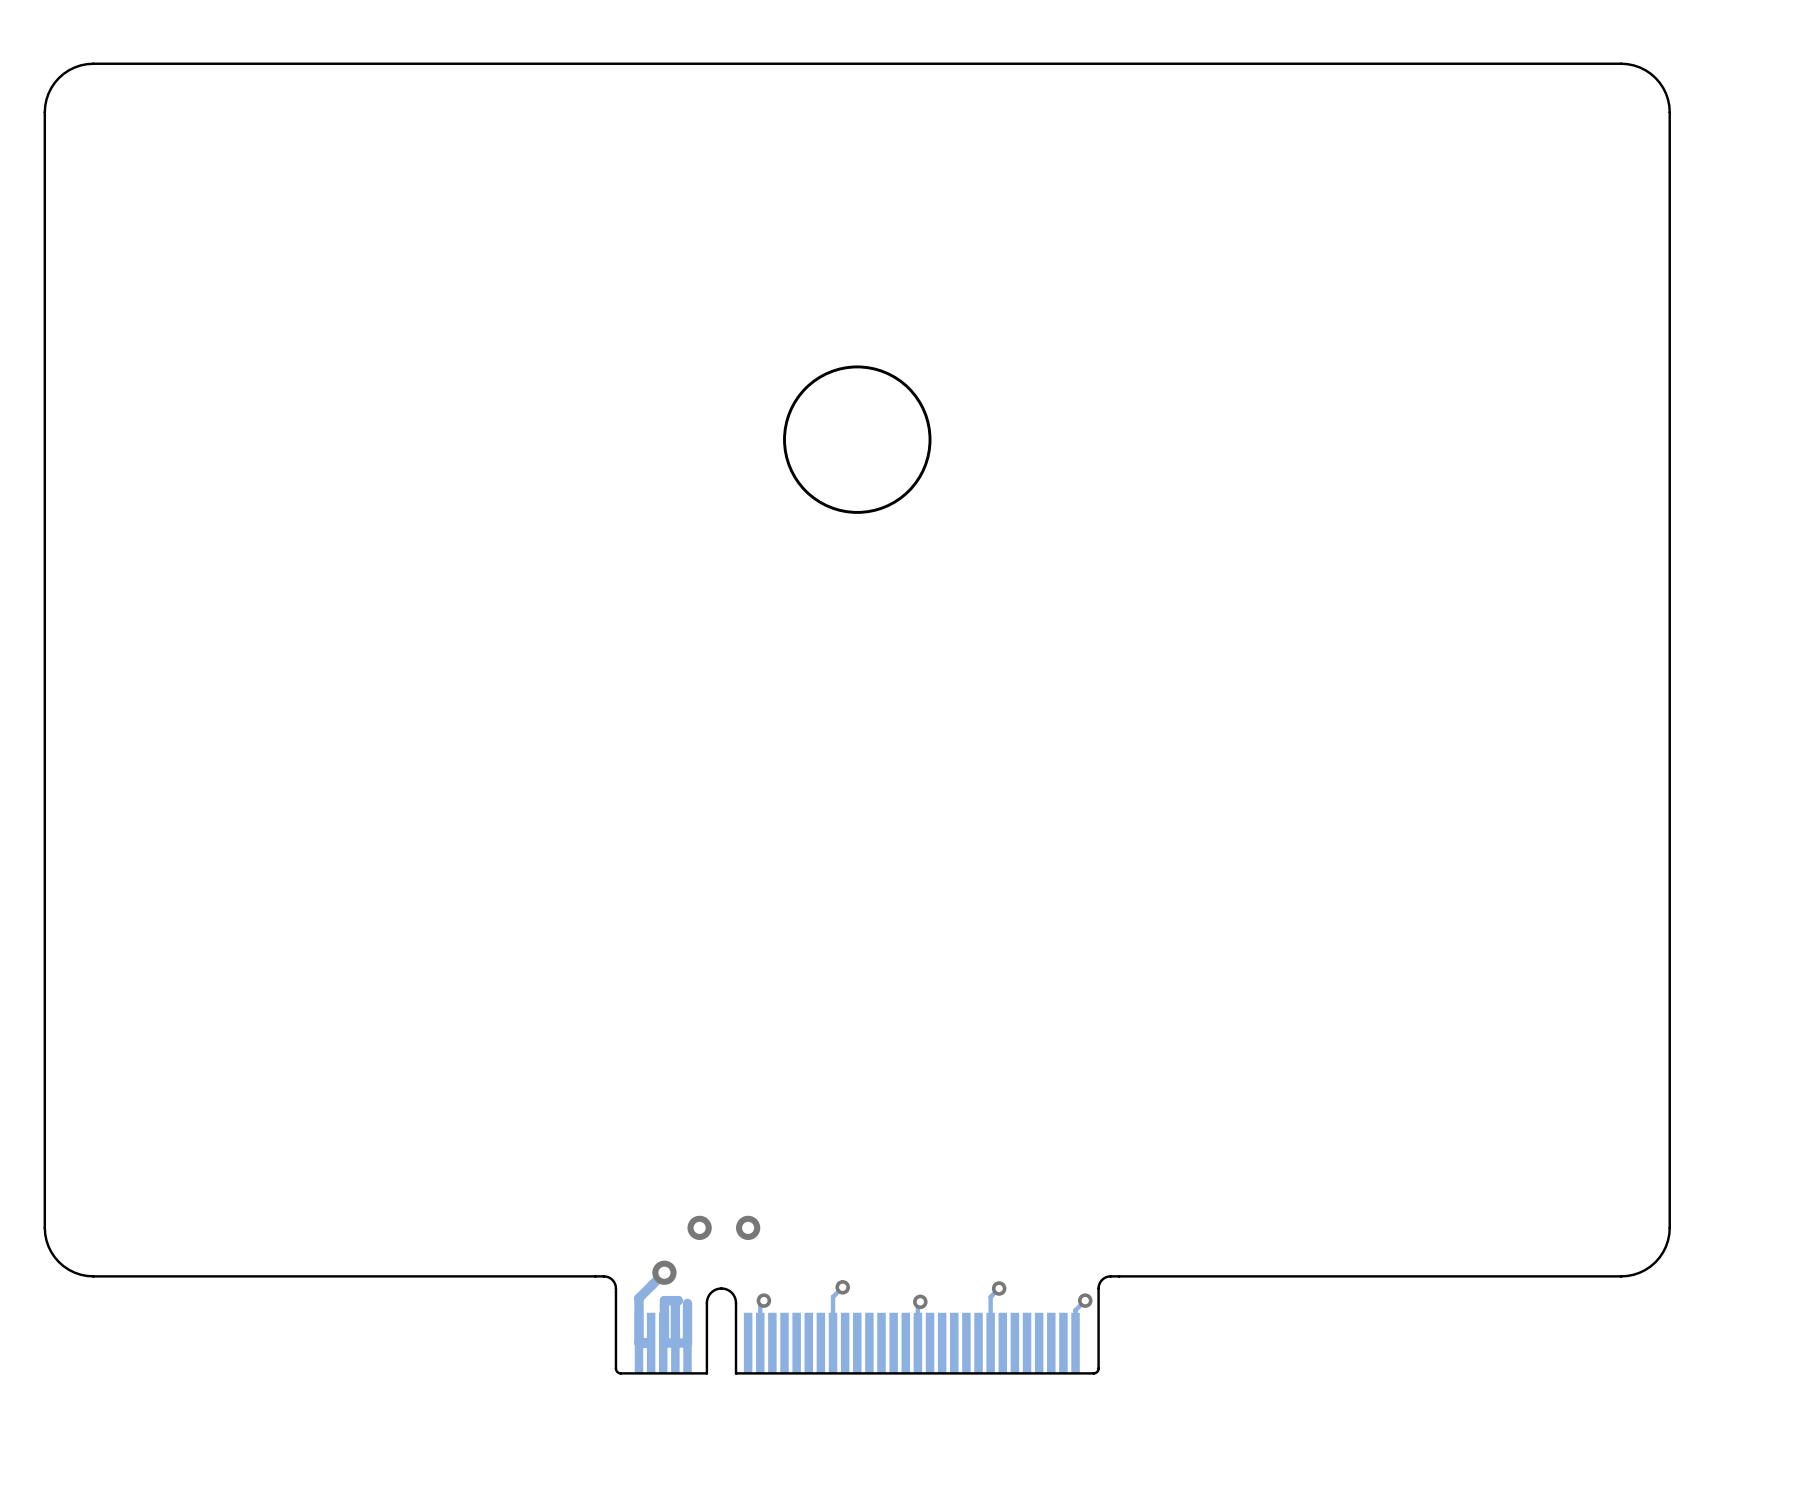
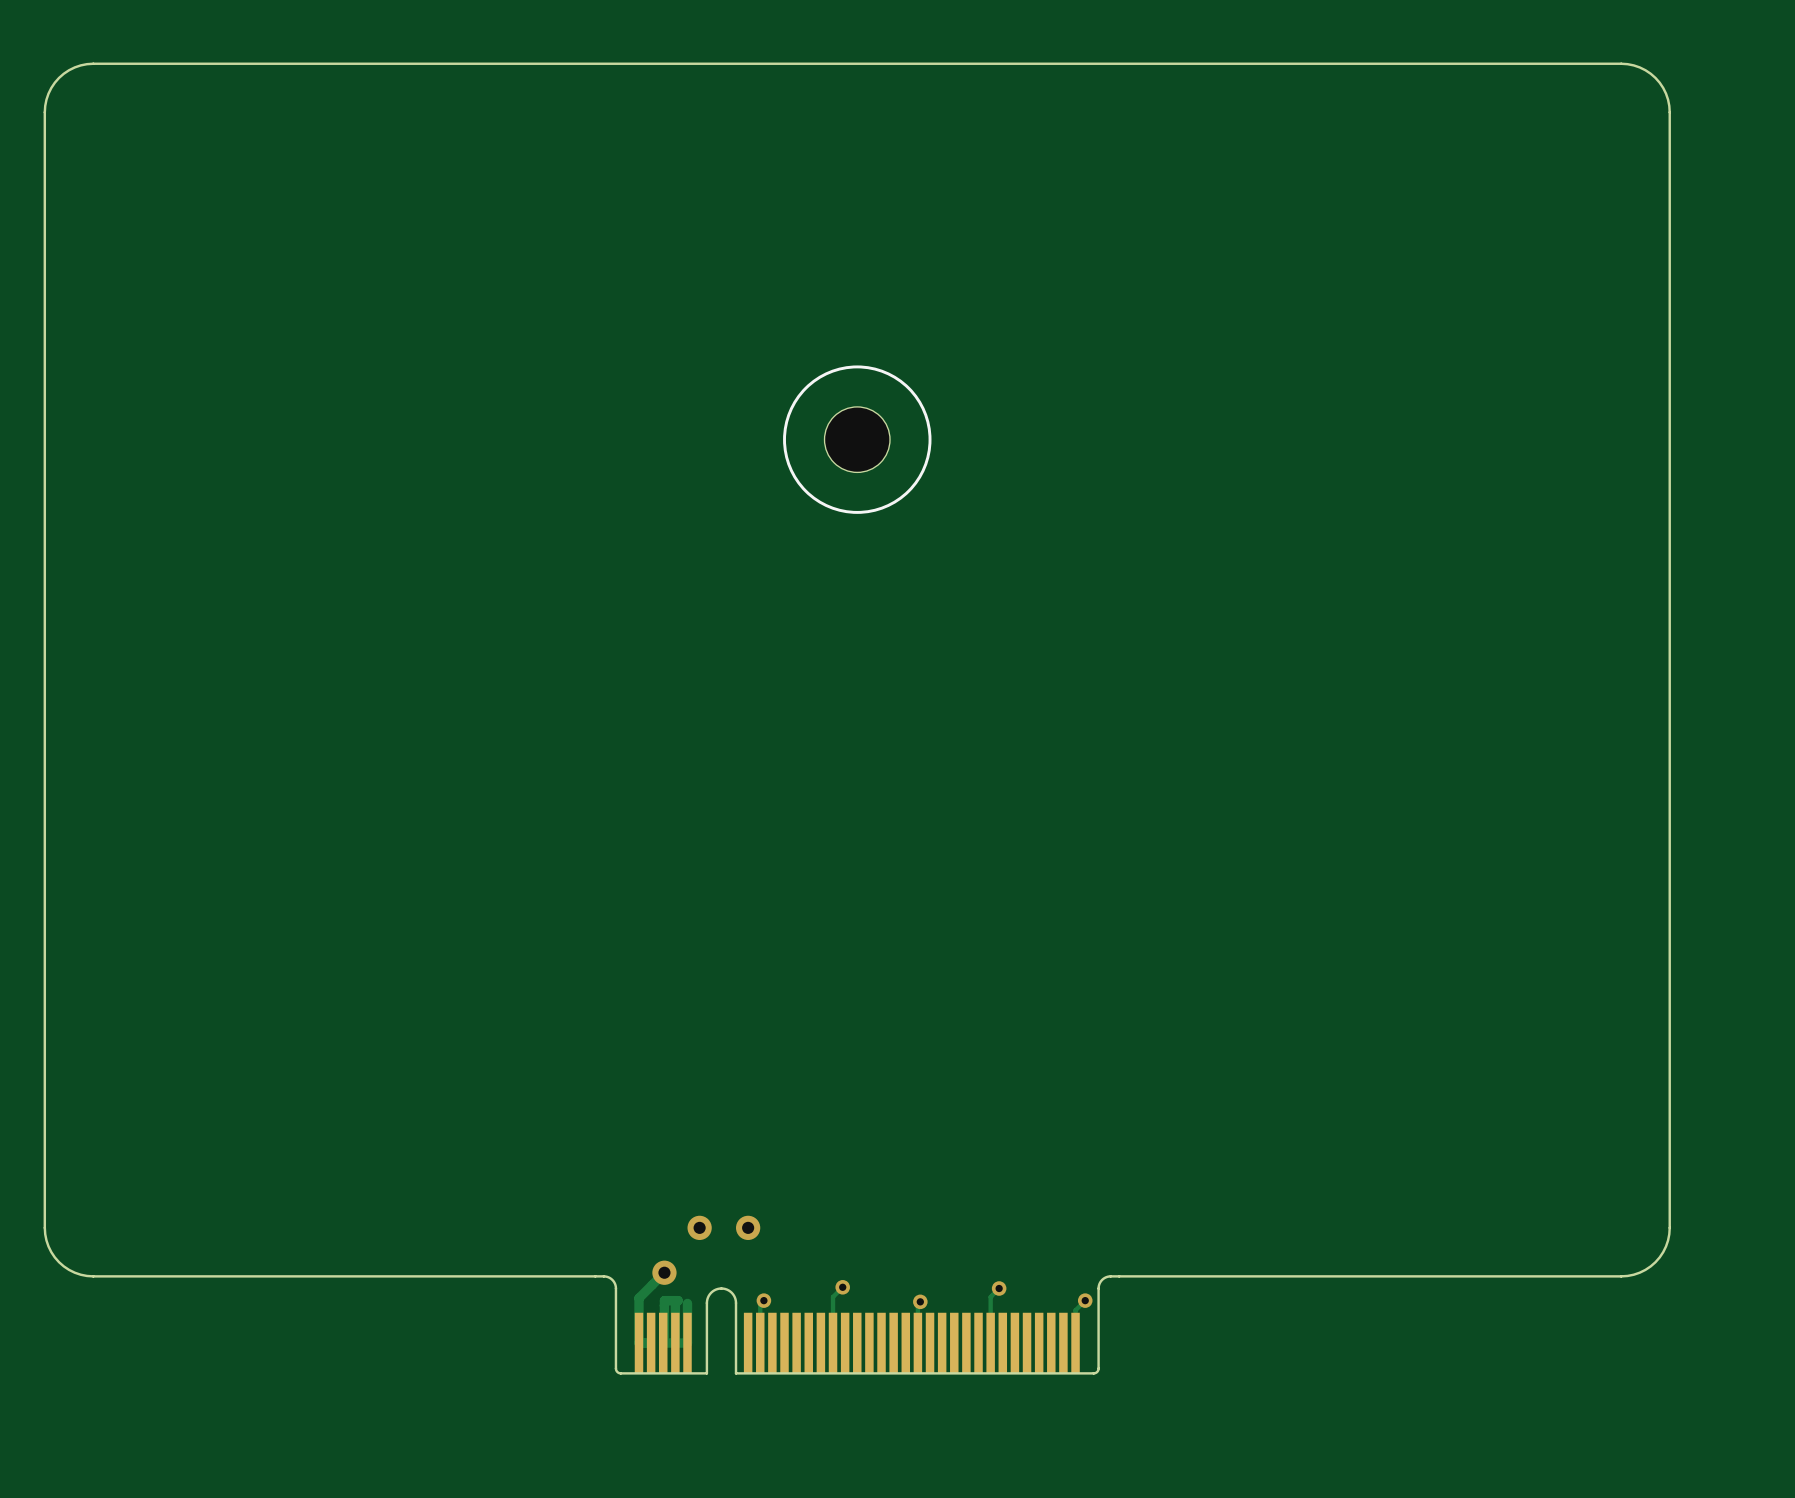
part: none -> (857, 439)

